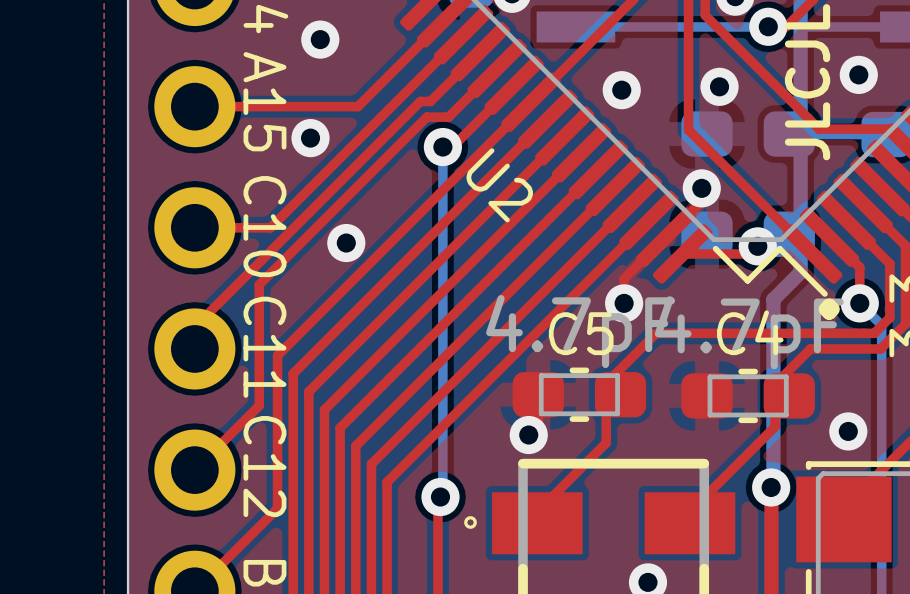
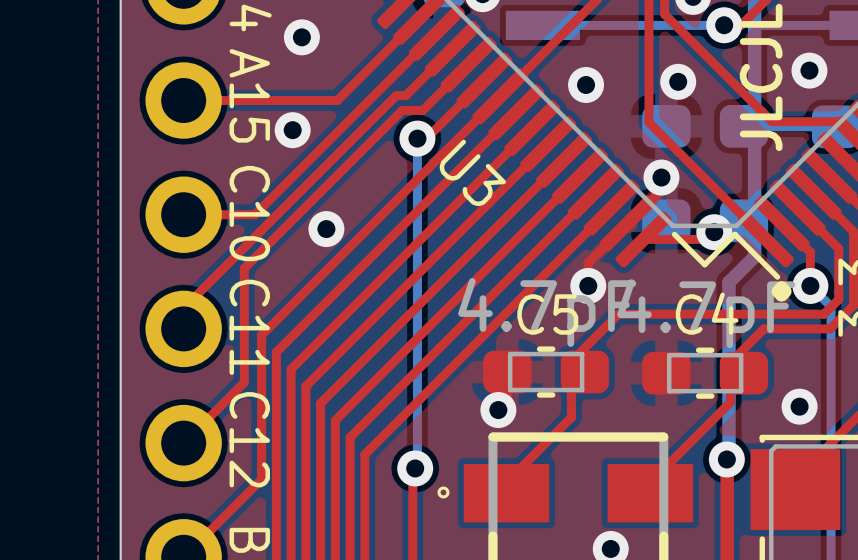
U2 name: U2 (499, 185) -> U3 (472, 172)

